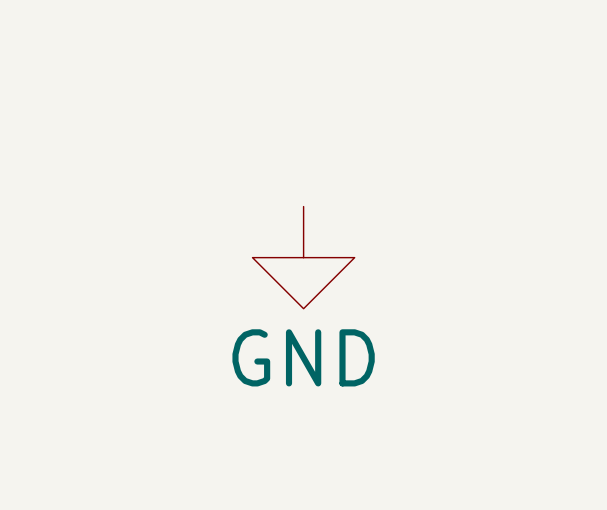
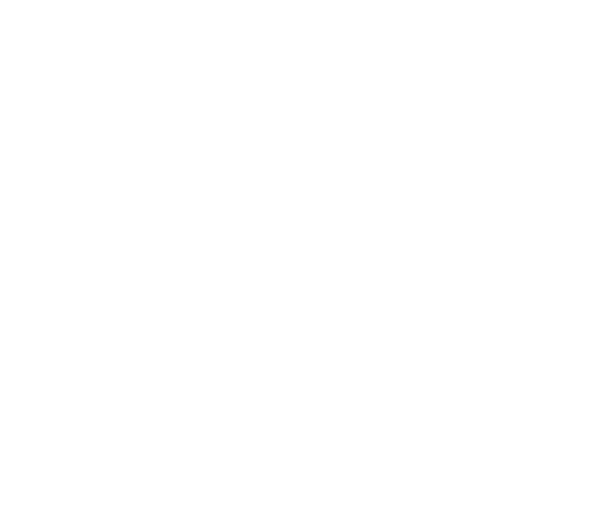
power symbol: GND (303, 257) -> none

